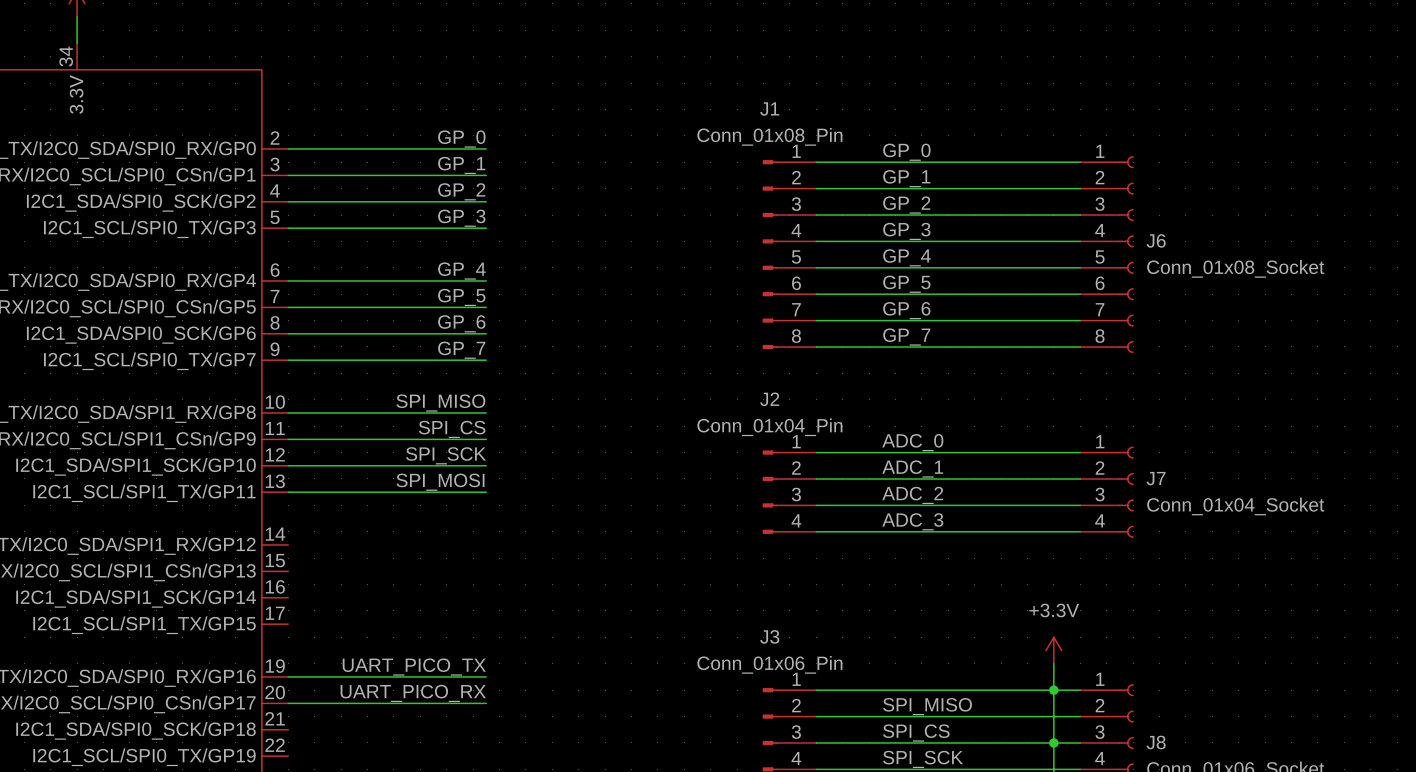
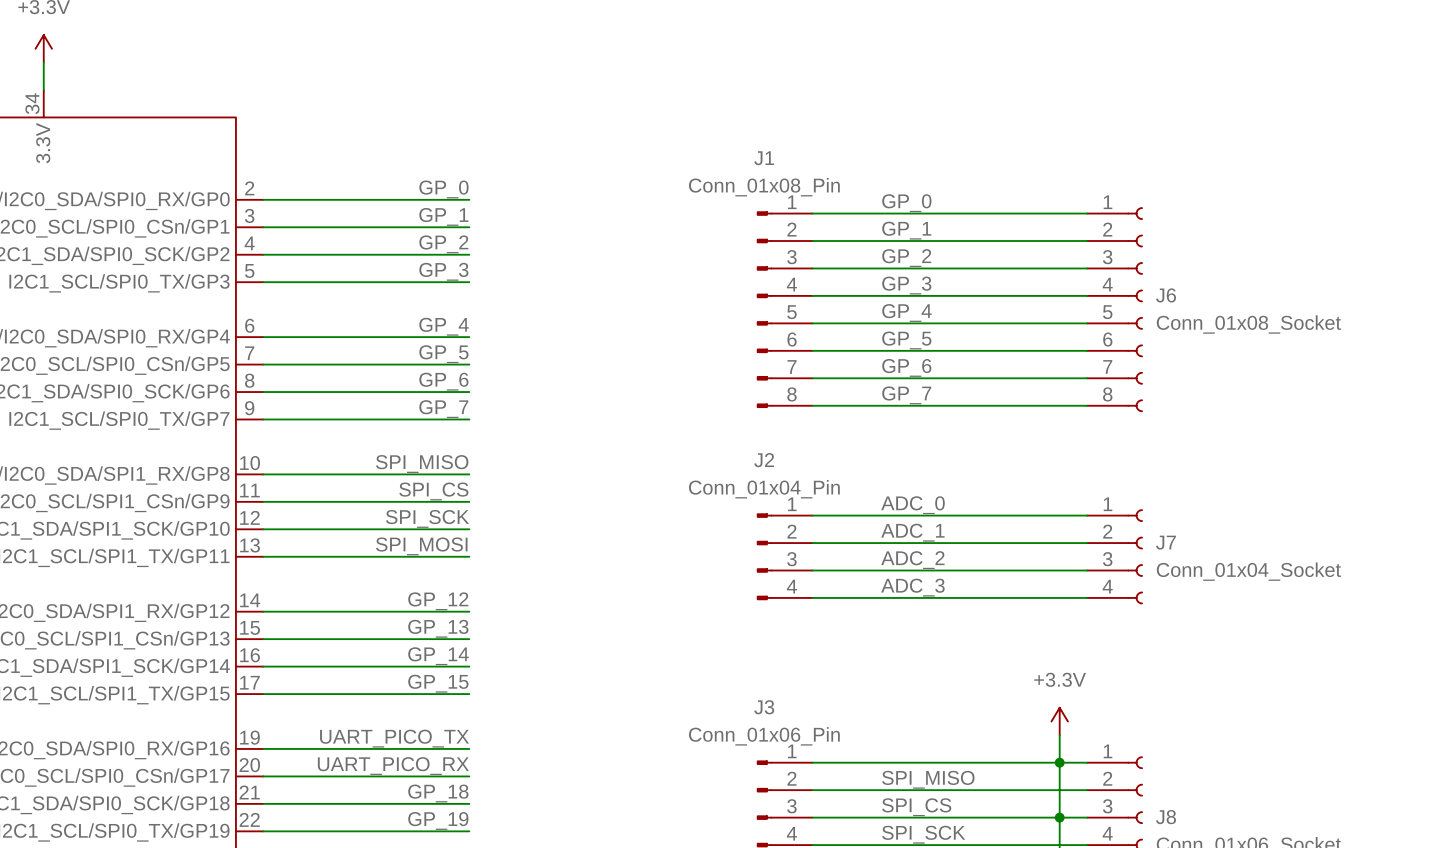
label: none -> GP_12 (438, 601)
wire: none -> (263, 611) (469, 611)
label: none -> GP_13 (438, 628)
wire: none -> (263, 639) (469, 639)
label: none -> GP_14 (438, 656)
wire: none -> (263, 666) (469, 666)
label: none -> GP_15 (438, 683)
wire: none -> (263, 694) (469, 694)
label: none -> GP_18 (438, 793)
wire: none -> (263, 803) (469, 803)
label: none -> GP_19 (438, 820)
wire: none -> (263, 831) (469, 831)

